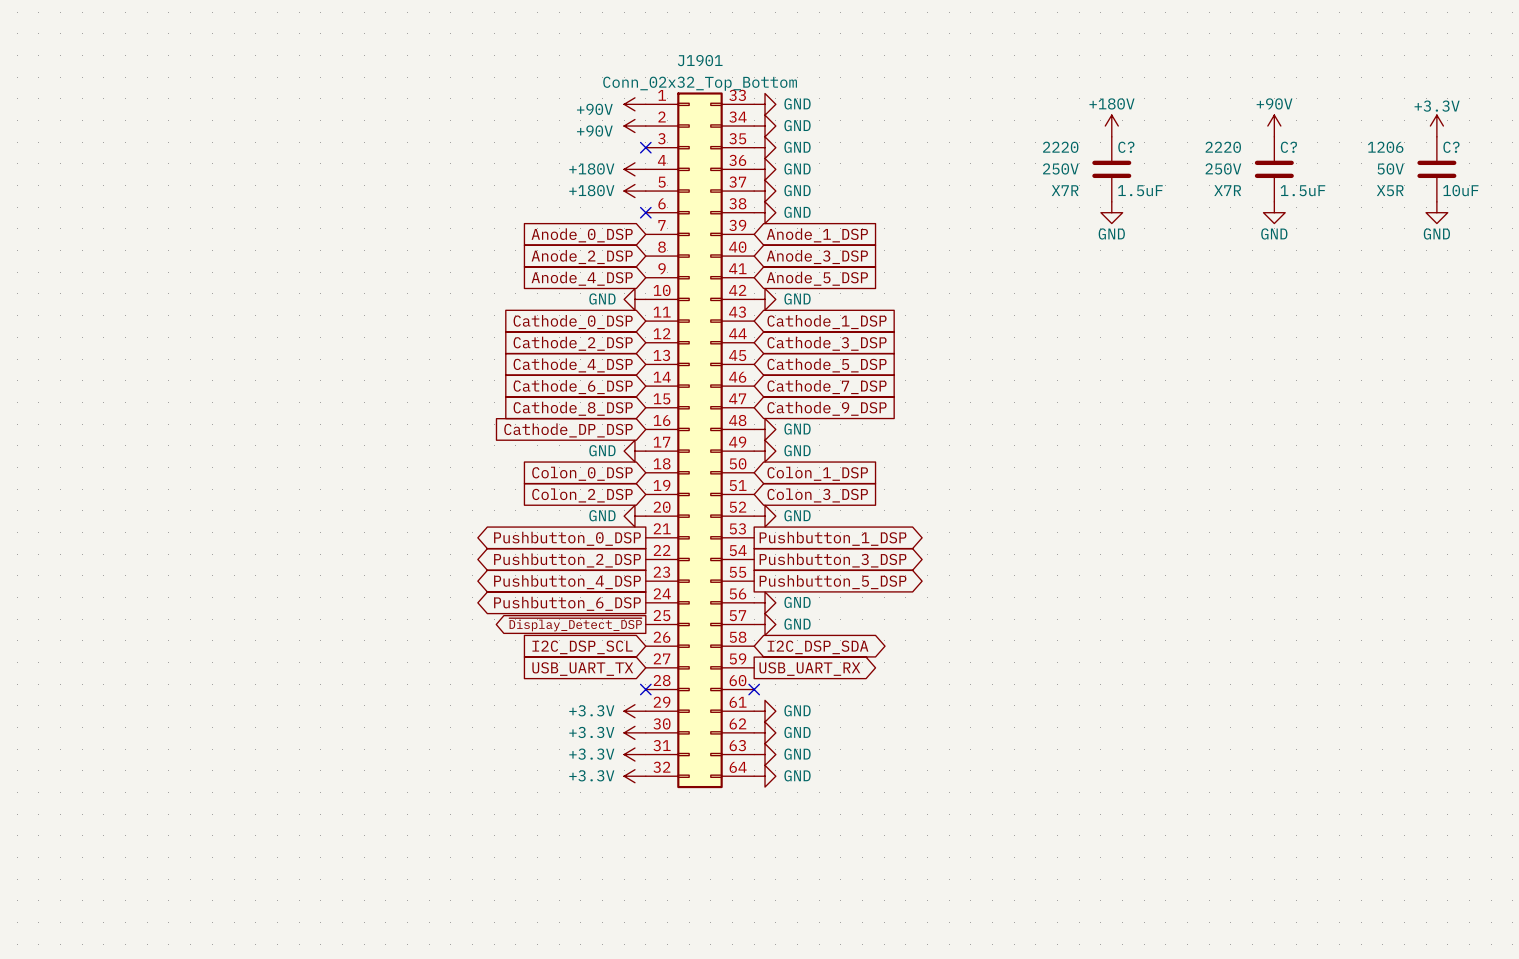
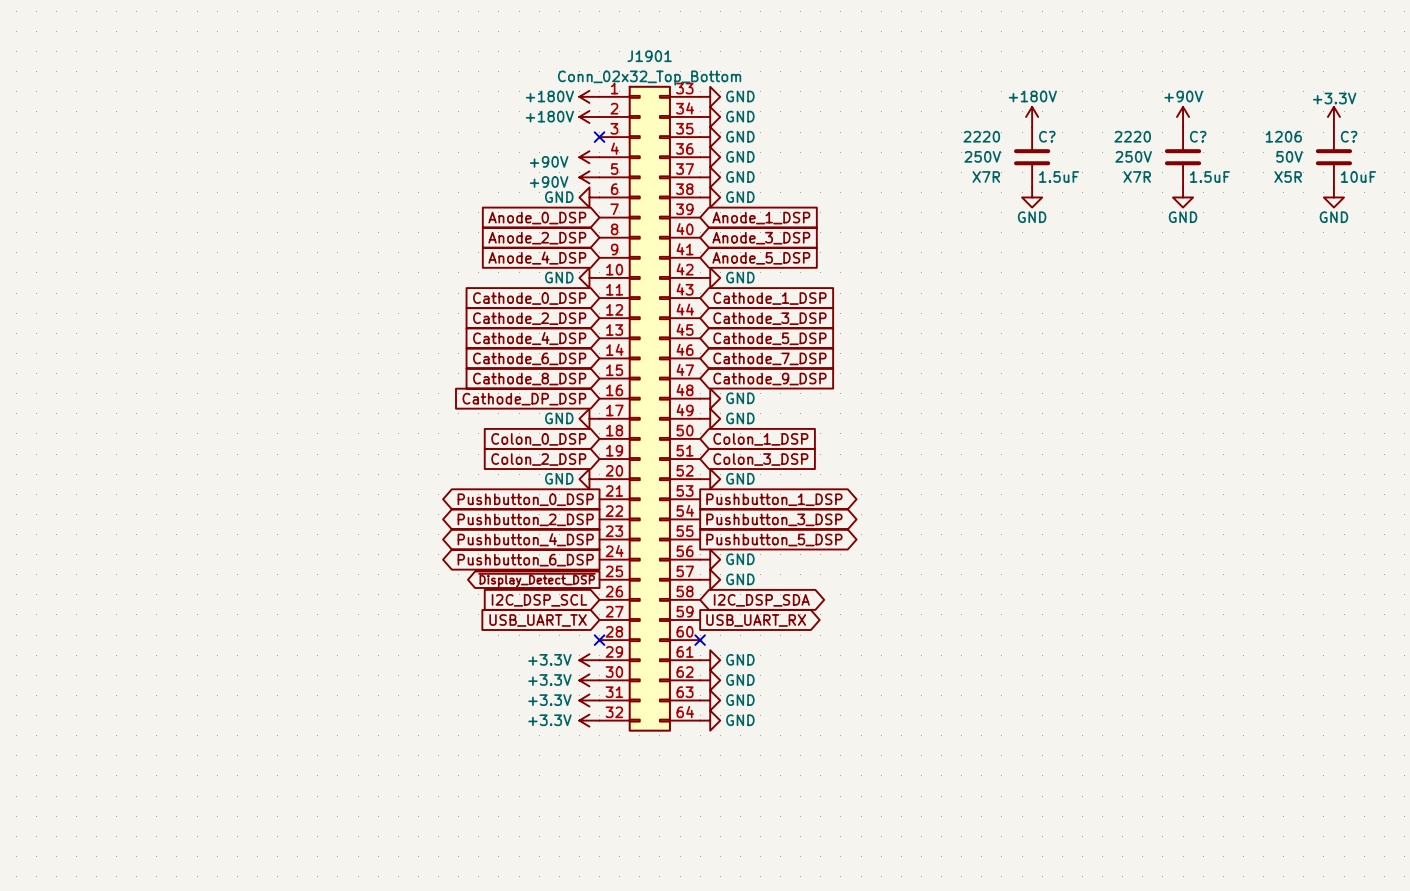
power symbol: +90V (634, 104) -> +180V (589, 96)
power symbol: +90V (634, 126) -> +180V (589, 116)
power symbol: +180V (634, 169) -> +90V (589, 157)
power symbol: +180V (634, 191) -> +90V (589, 177)
power symbol: none -> GND (589, 197)
no-connect mark: (645, 212) -> none

